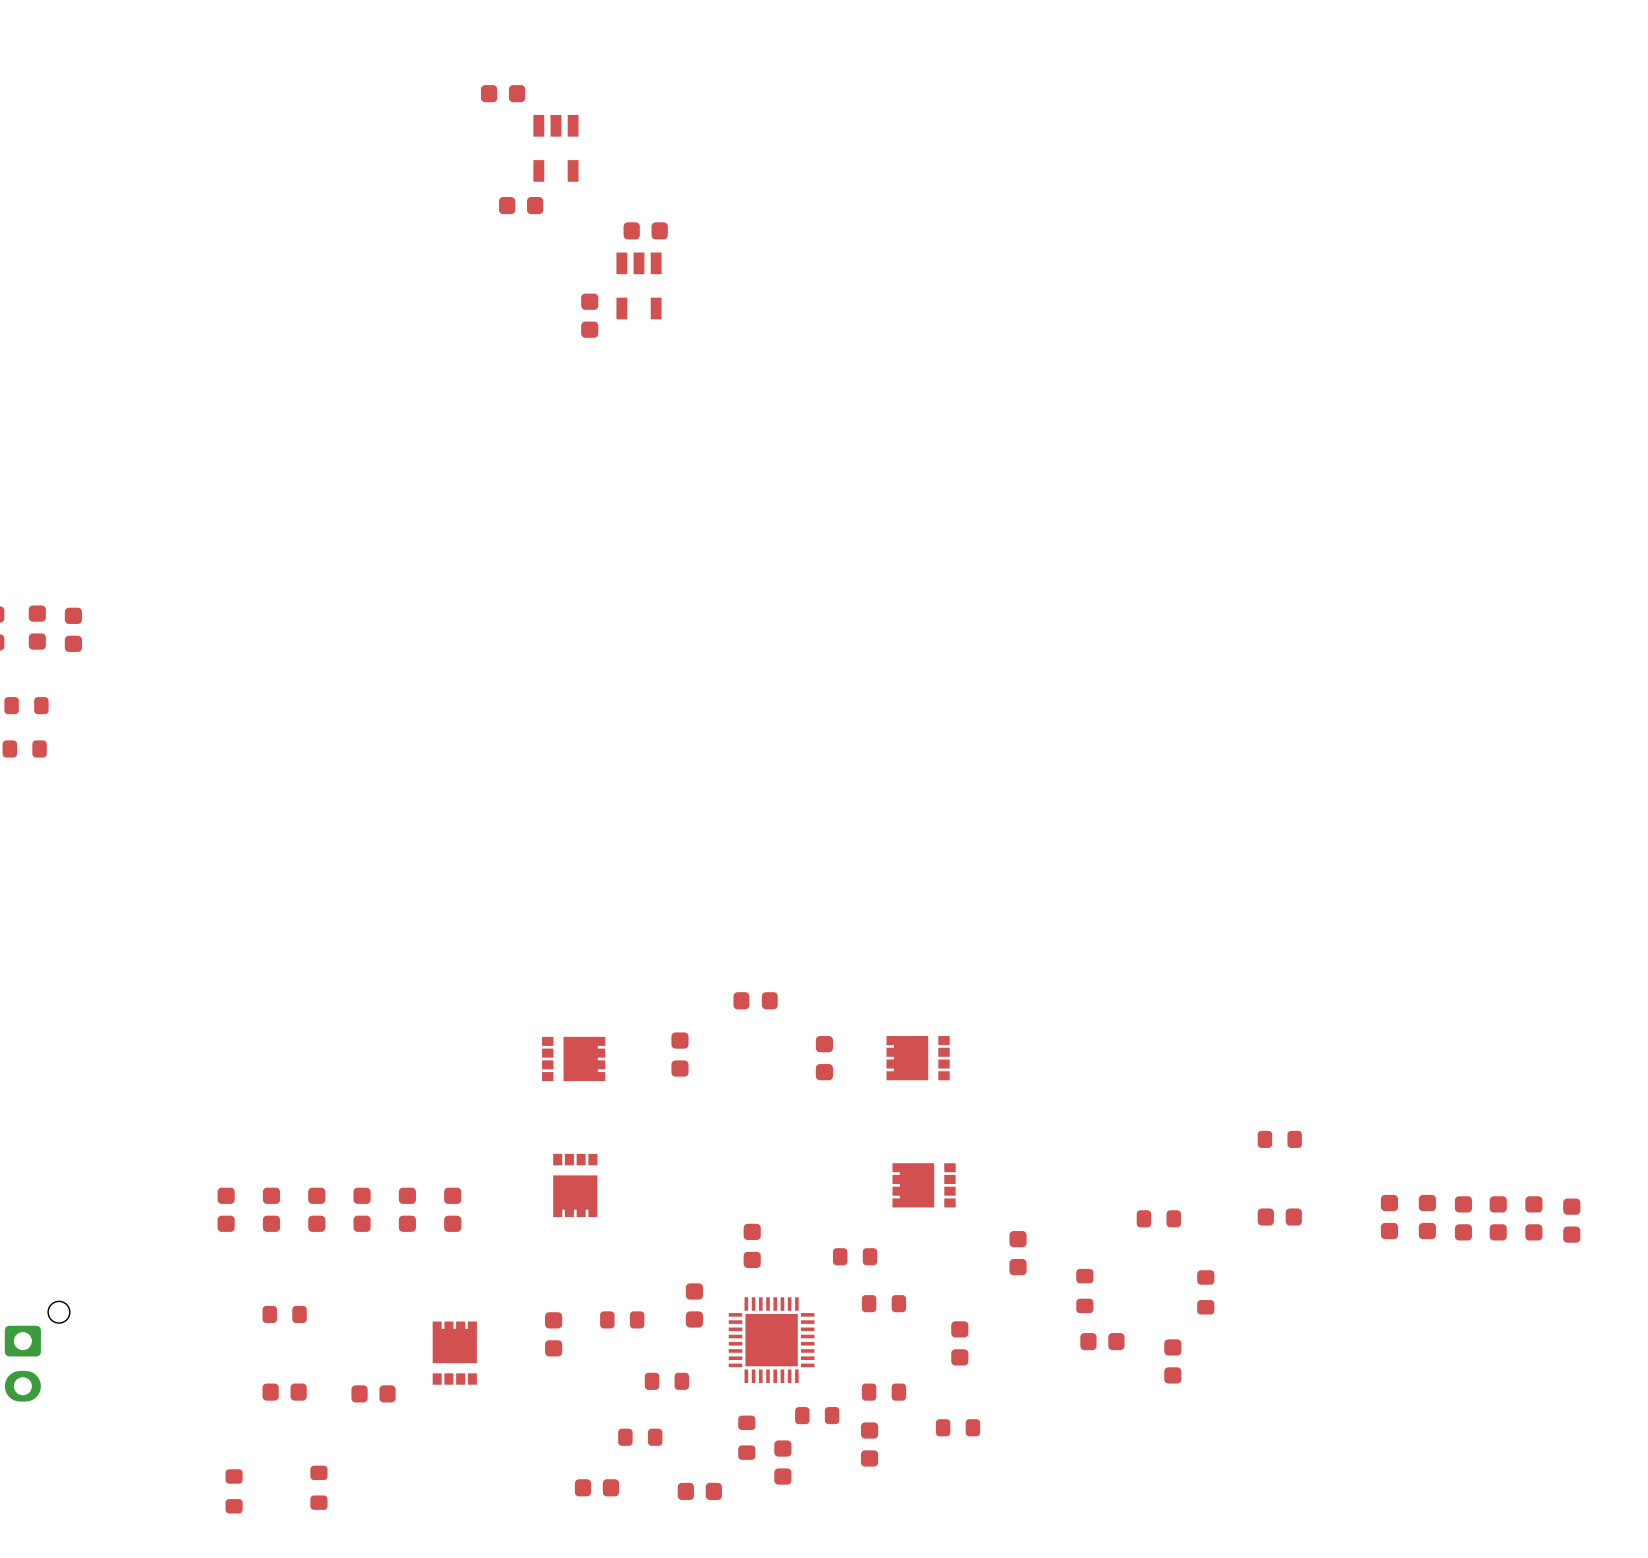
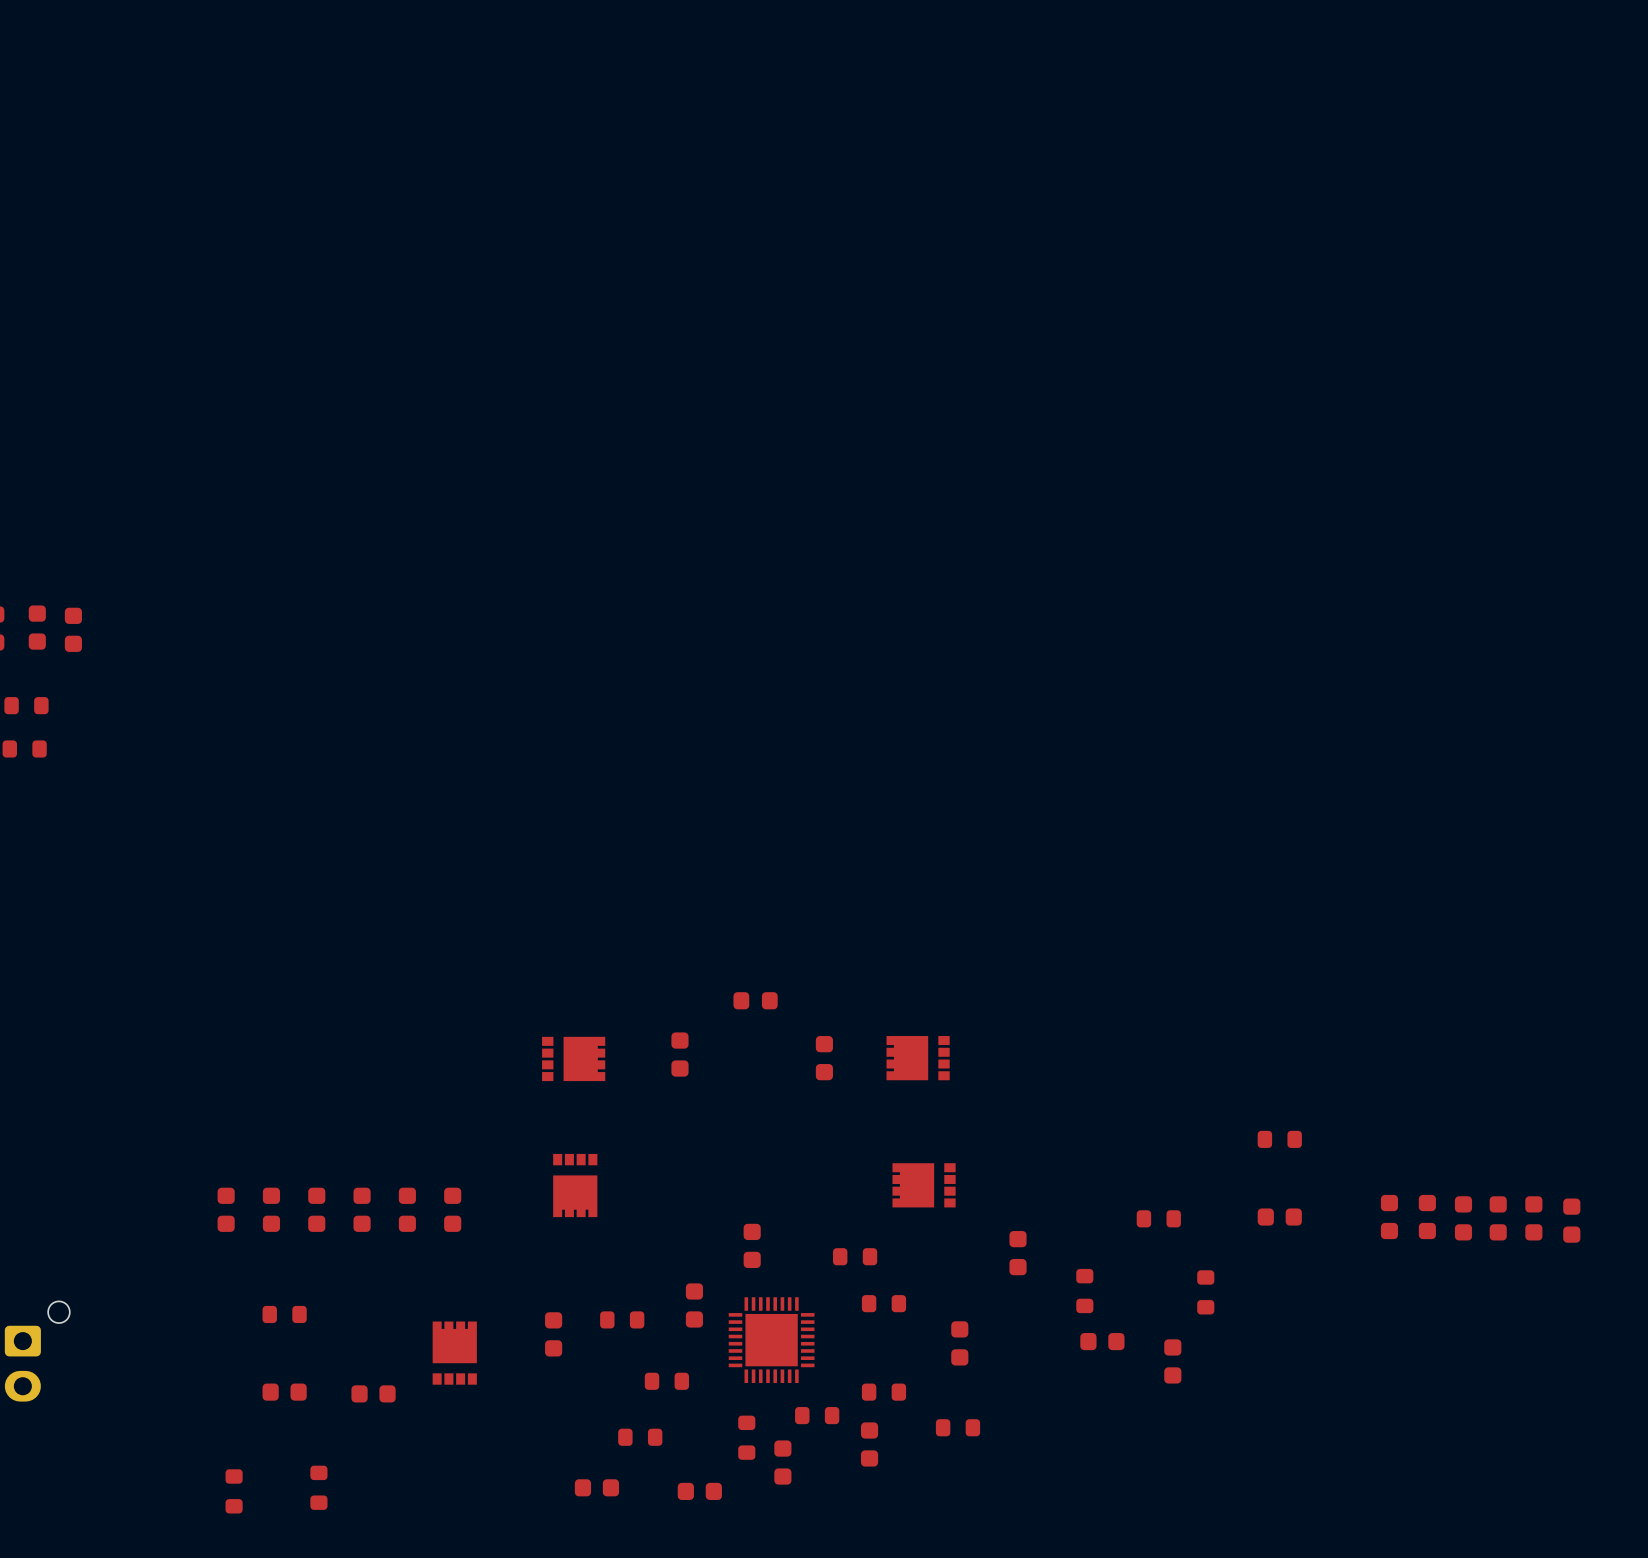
part: (503, 93) -> none
part: (555, 148) -> none
part: (521, 205) -> none
part: (645, 230) -> none
part: (639, 285) -> none
part: (589, 315) -> none

